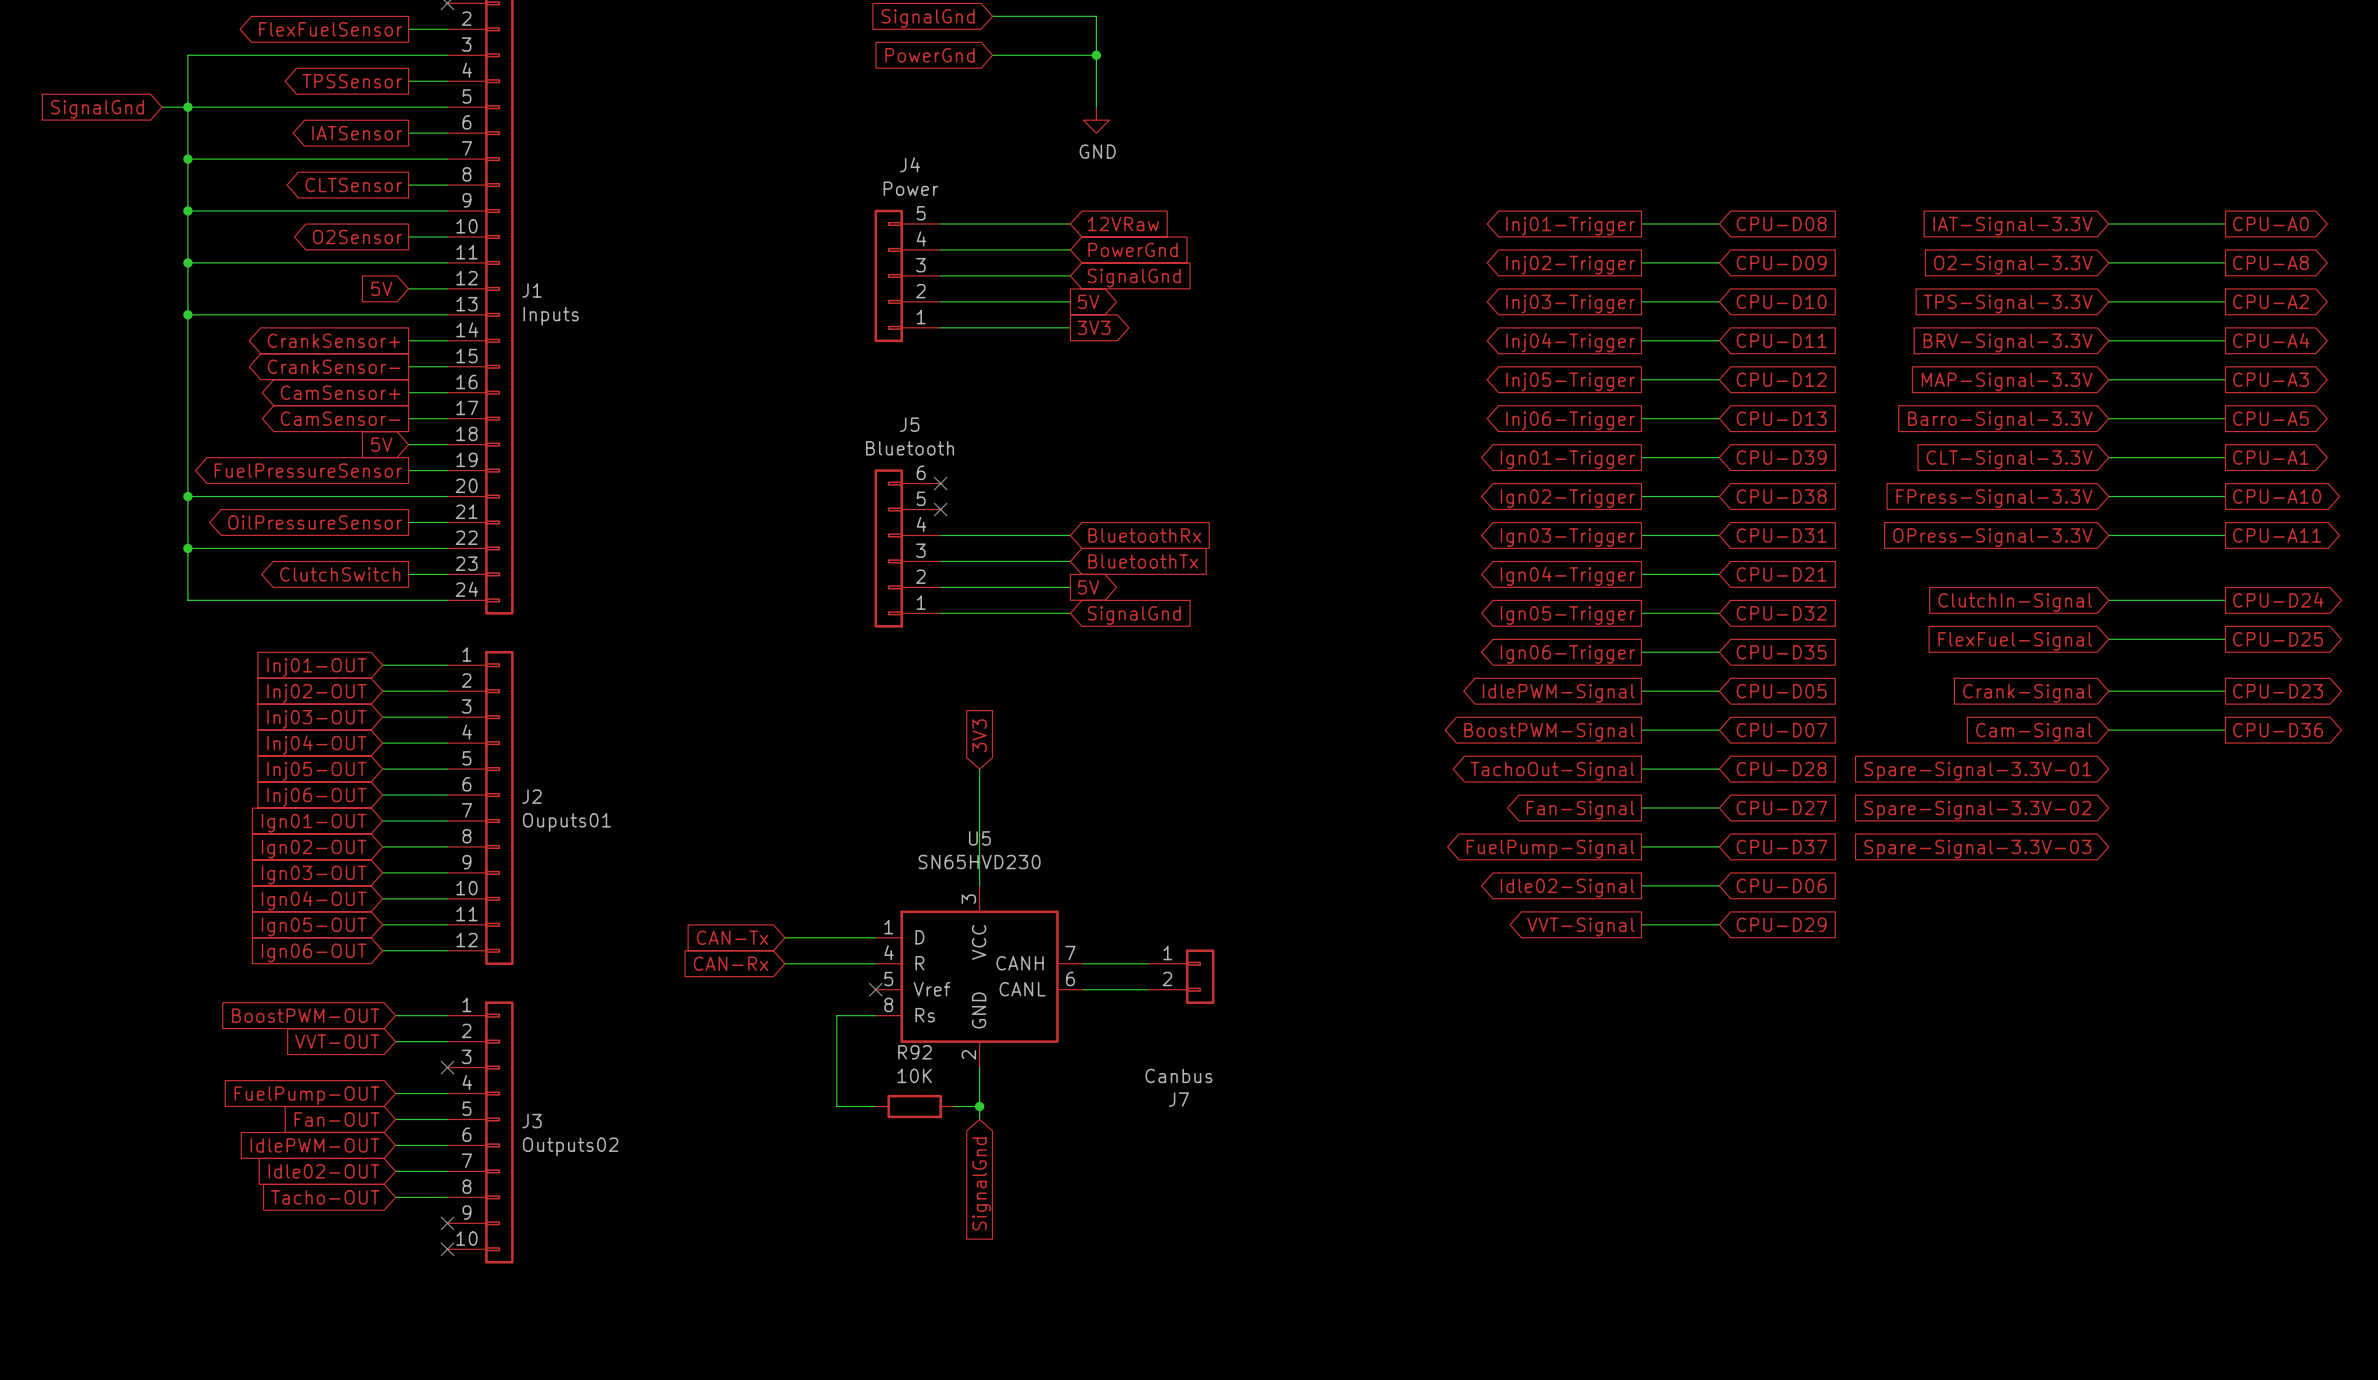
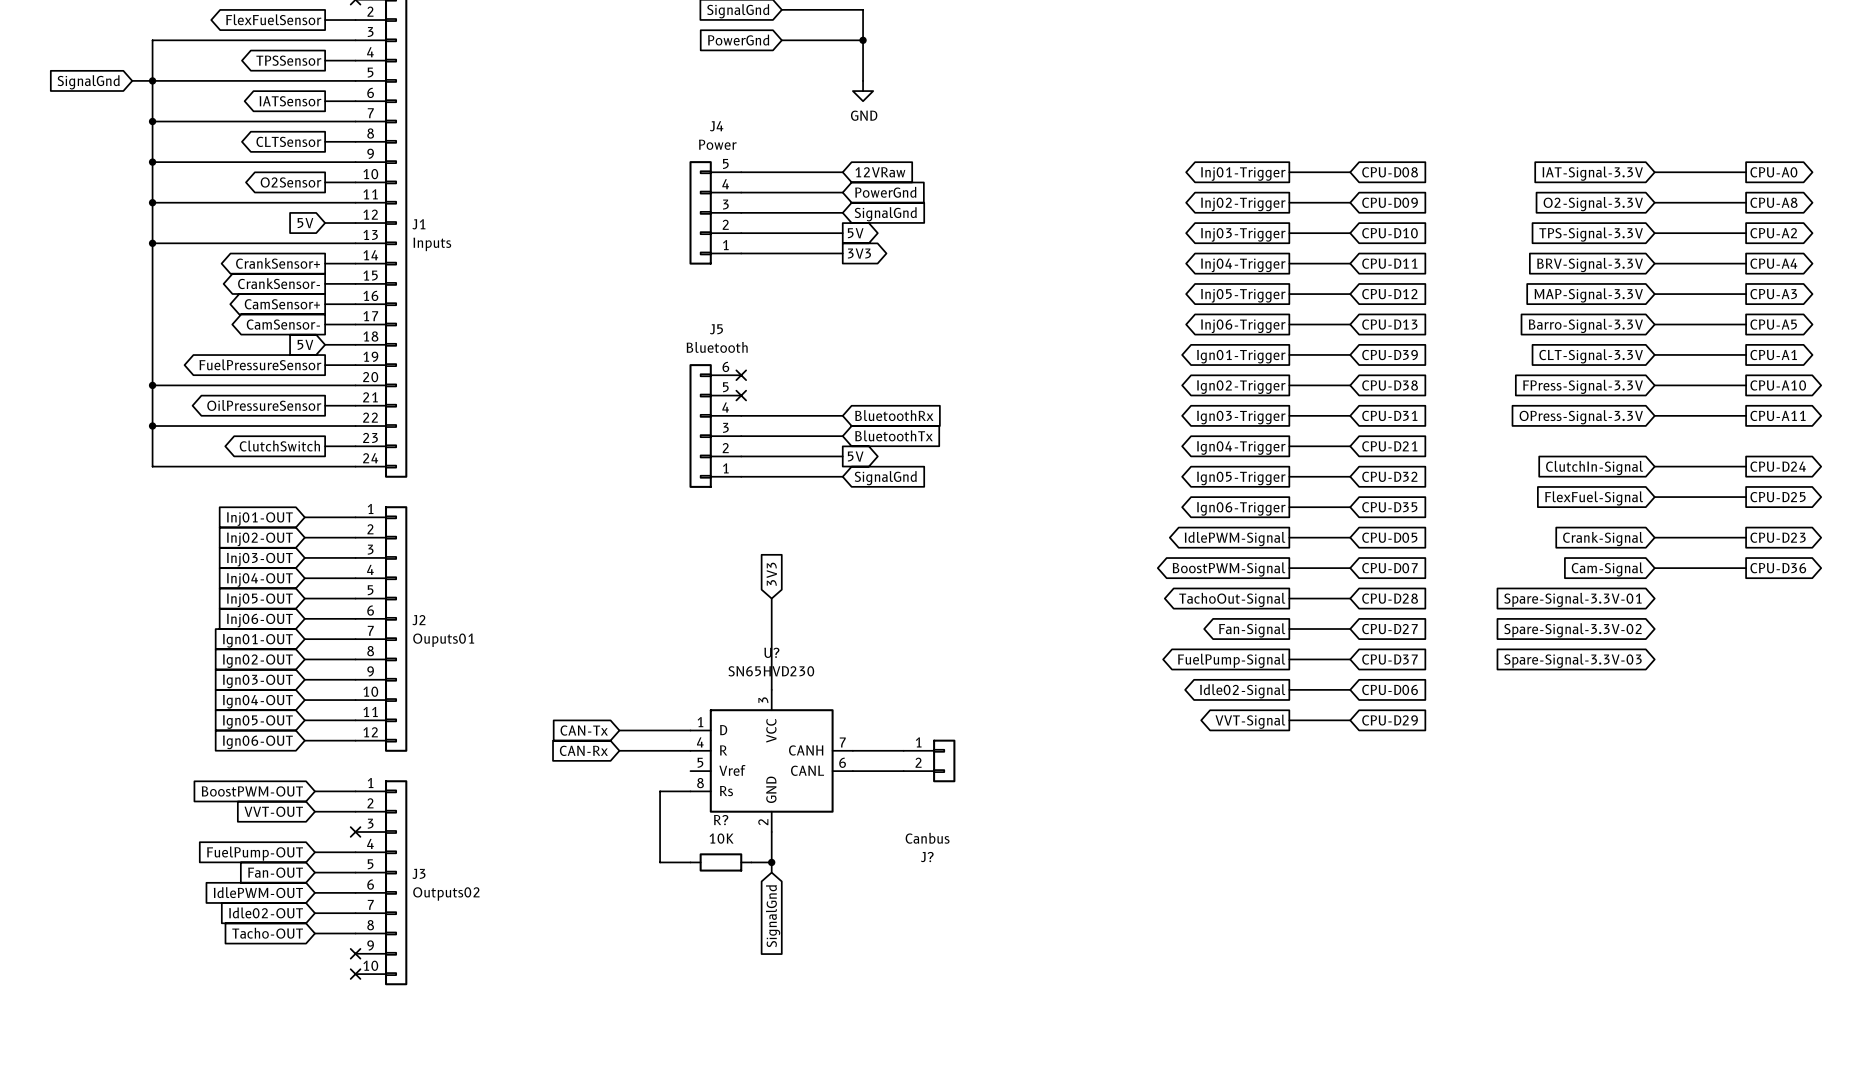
U5 name: U5 (979, 838) -> U? (771, 652)
no-connect mark: (875, 989) -> none
R92 name: R92 (915, 1052) -> R? (721, 820)
J7 name: J7 (1178, 1099) -> J? (927, 857)

